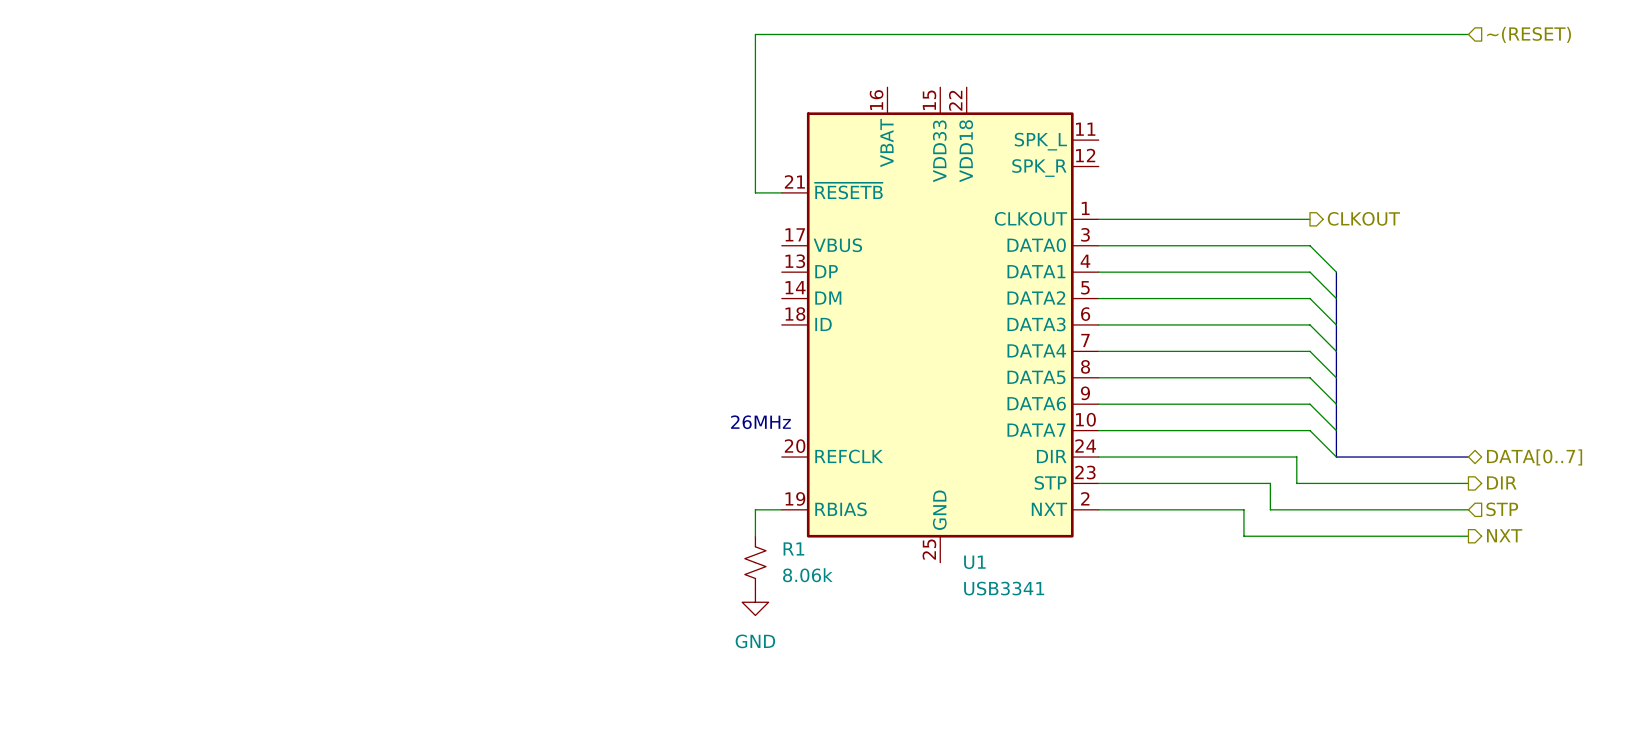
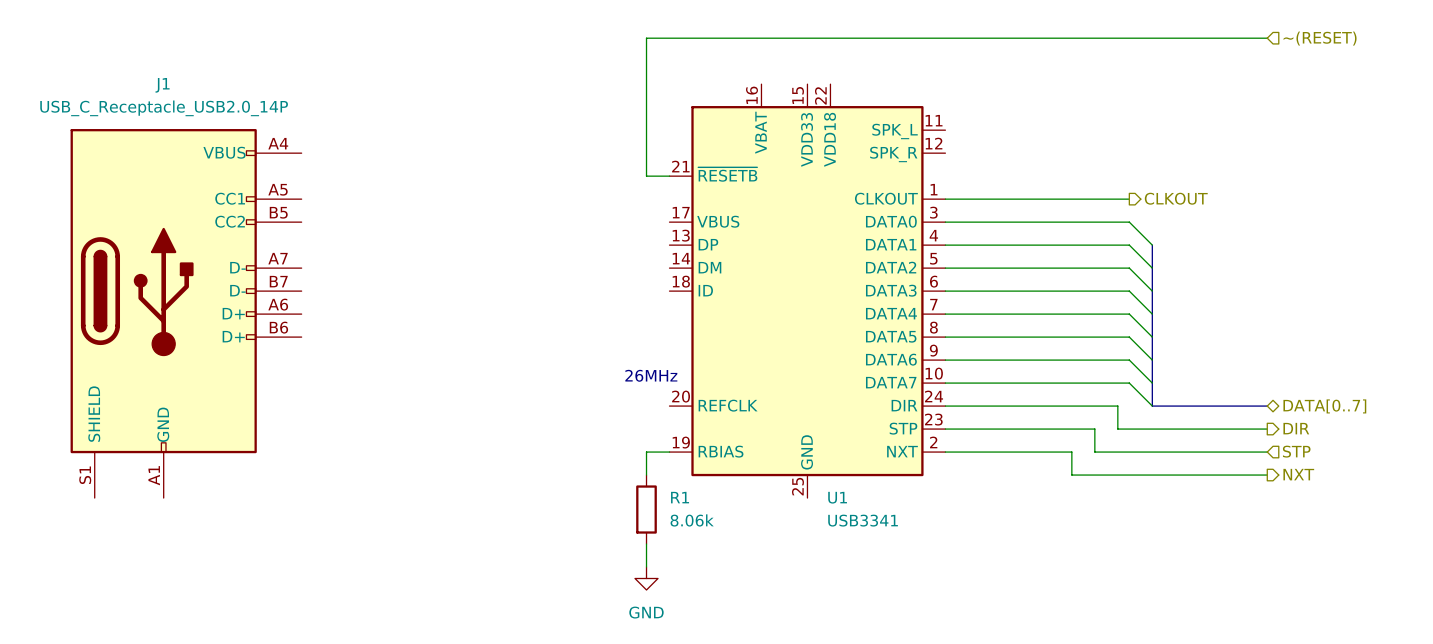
J1: none -> USB_C_Receptacle_USB2.0_14P (186, 313)
R1 symbol: [744, 536, 766, 590] -> [636, 475, 657, 545]
power symbol position: GND (755, 602) -> GND (646, 578)
wire: none -> (646, 544) (646, 567)

